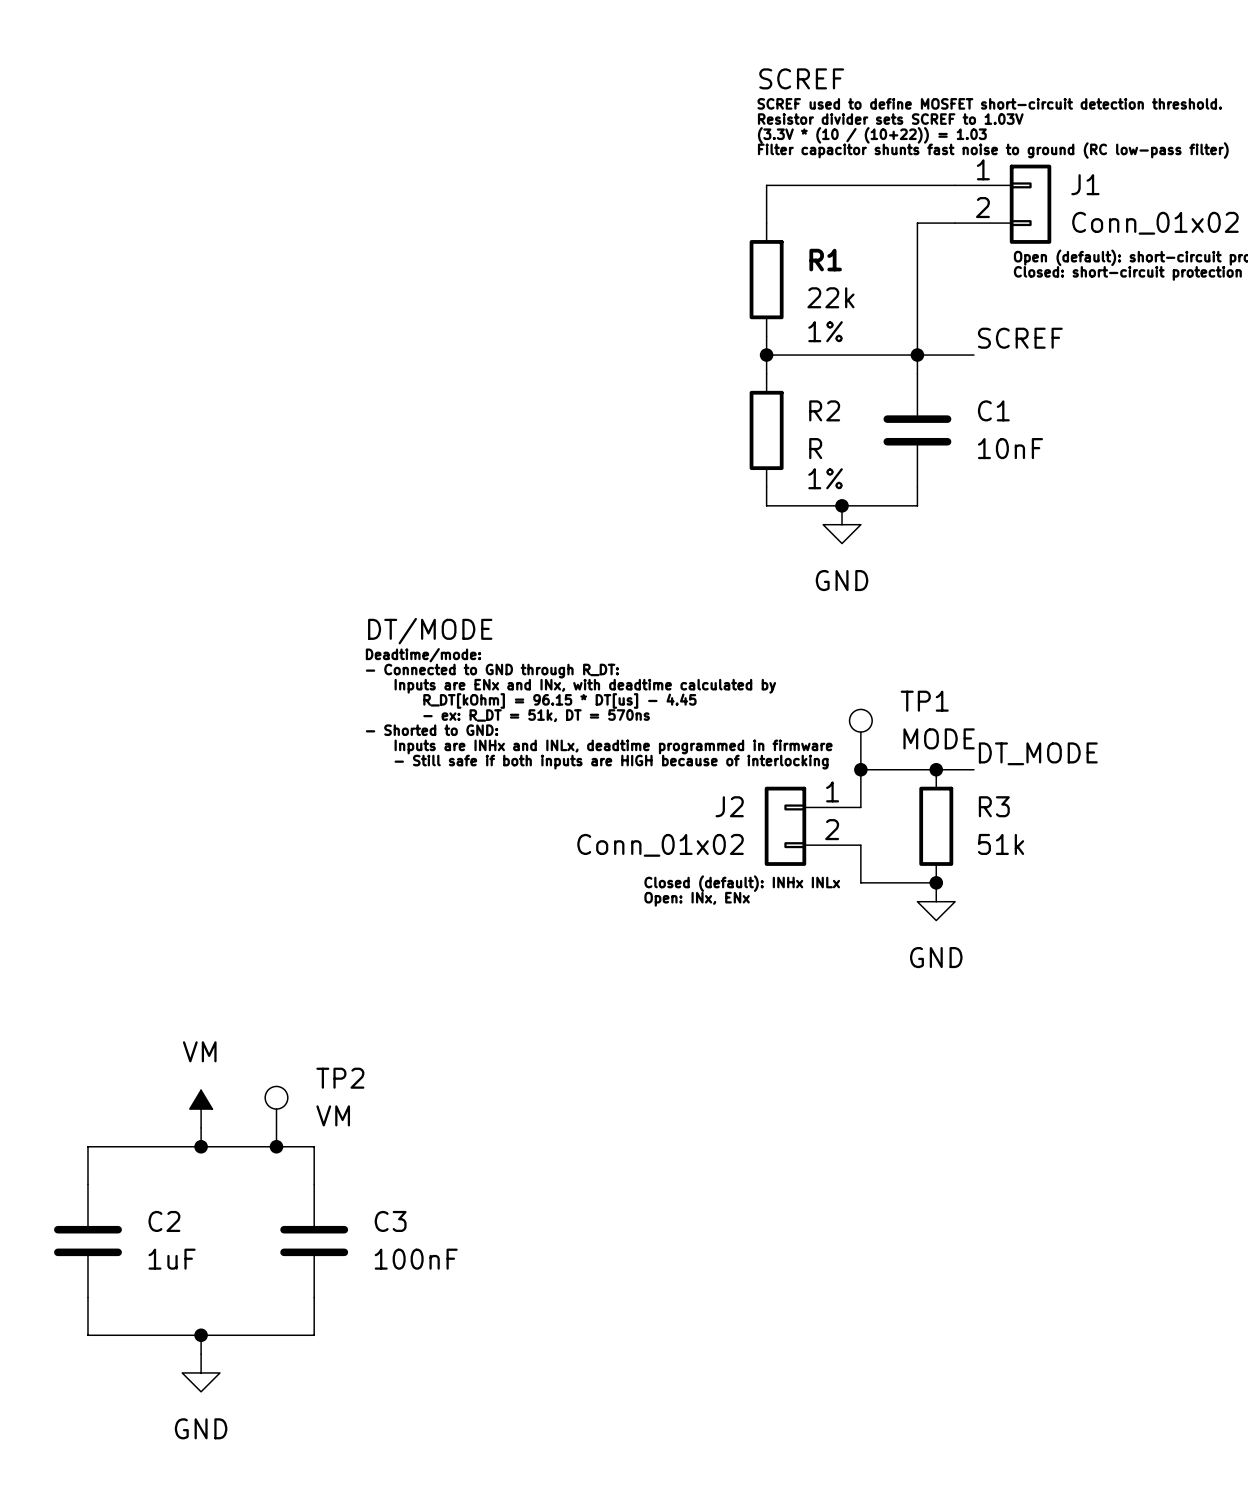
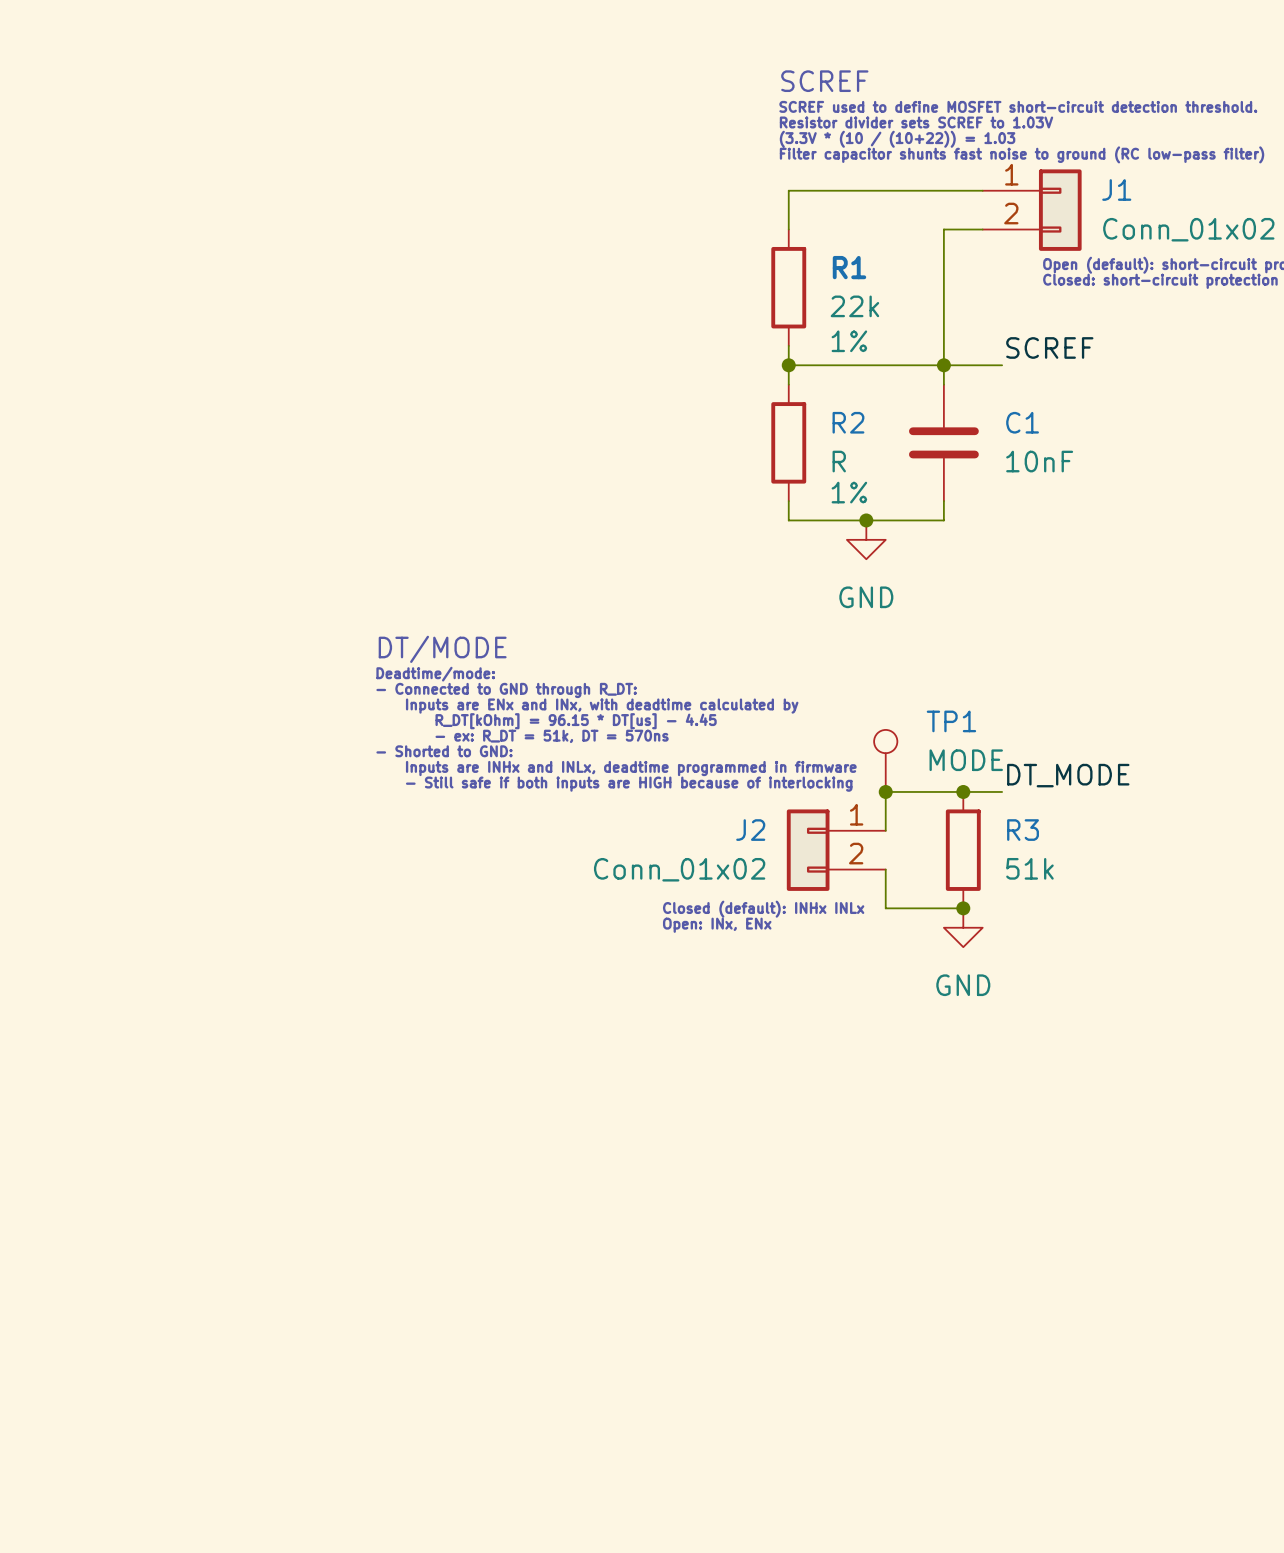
power symbol: VM (201, 1109) -> none
TP2: VM (276, 1116) -> none
wire: (201, 1127) (201, 1146) -> none
junction: (201, 1146) -> none
junction: (276, 1146) -> none
wire: (87, 1184) (87, 1146) (314, 1146) (314, 1184) -> none
C2: 1uF (87, 1241) -> none
C3: 100nF (314, 1241) -> none
wire: (87, 1297) (87, 1335) (314, 1335) (314, 1297) -> none
wire: (201, 1335) (201, 1354) -> none
junction: (201, 1335) -> none
power symbol: GND (201, 1372) -> none

